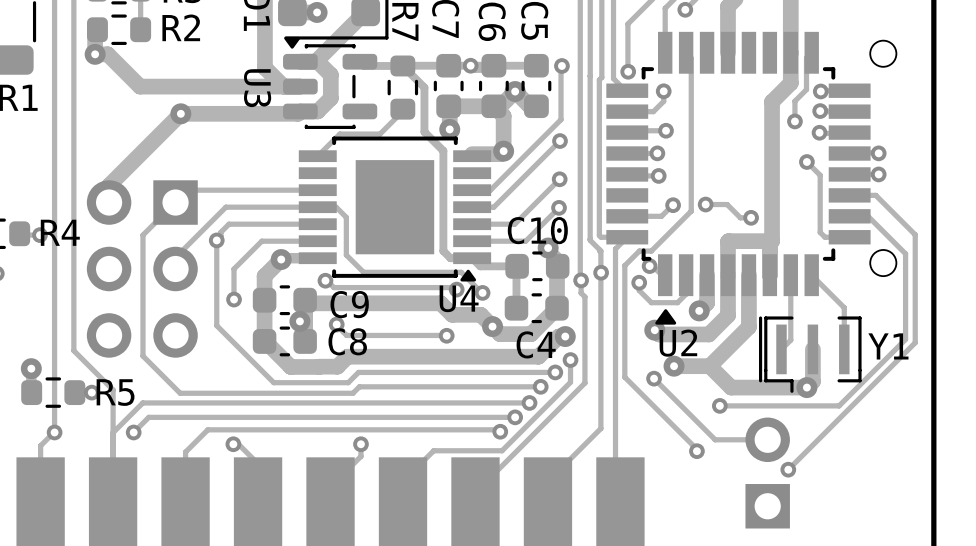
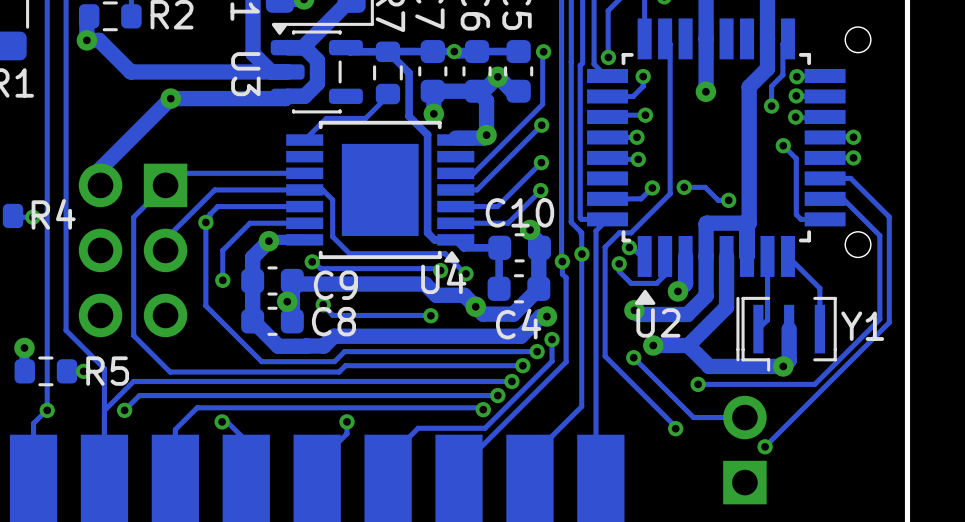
track: none -> (706, 38) (706, 91)
via: none -> (705, 91)

